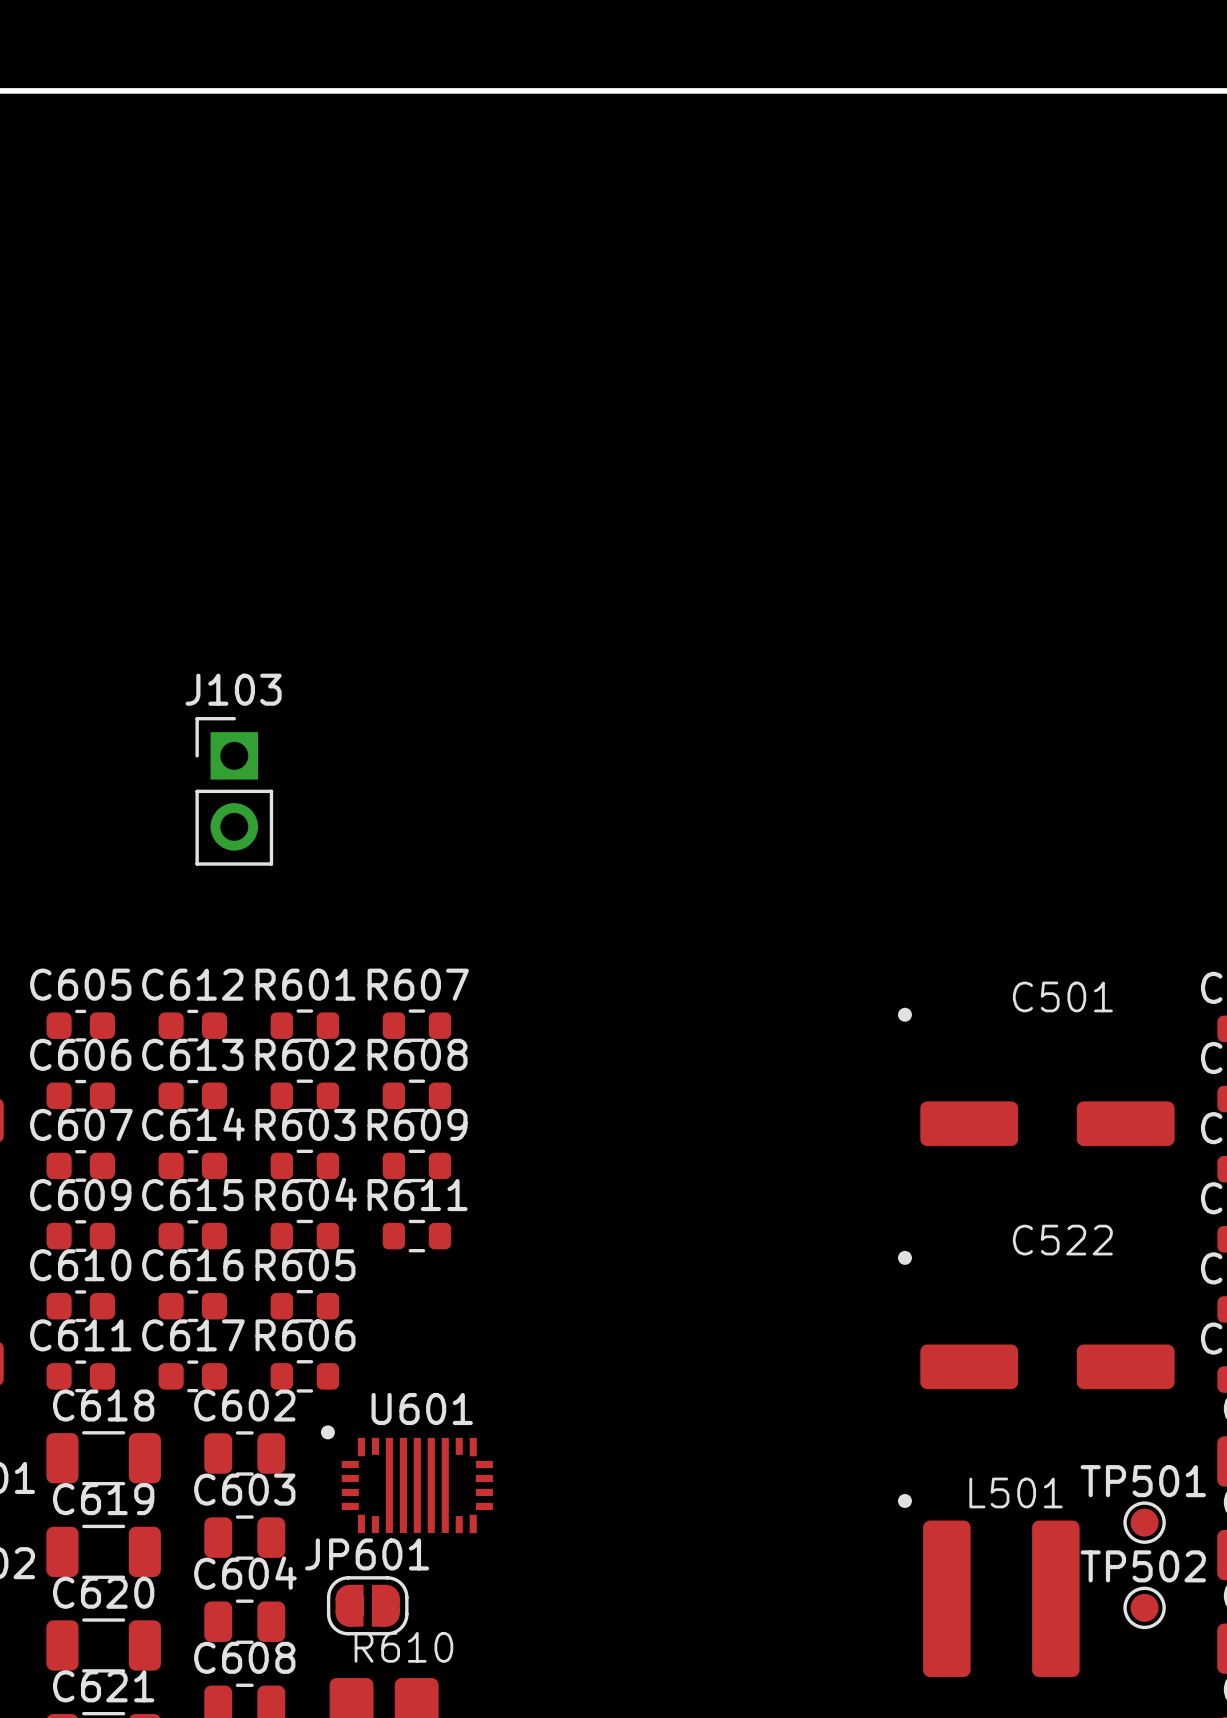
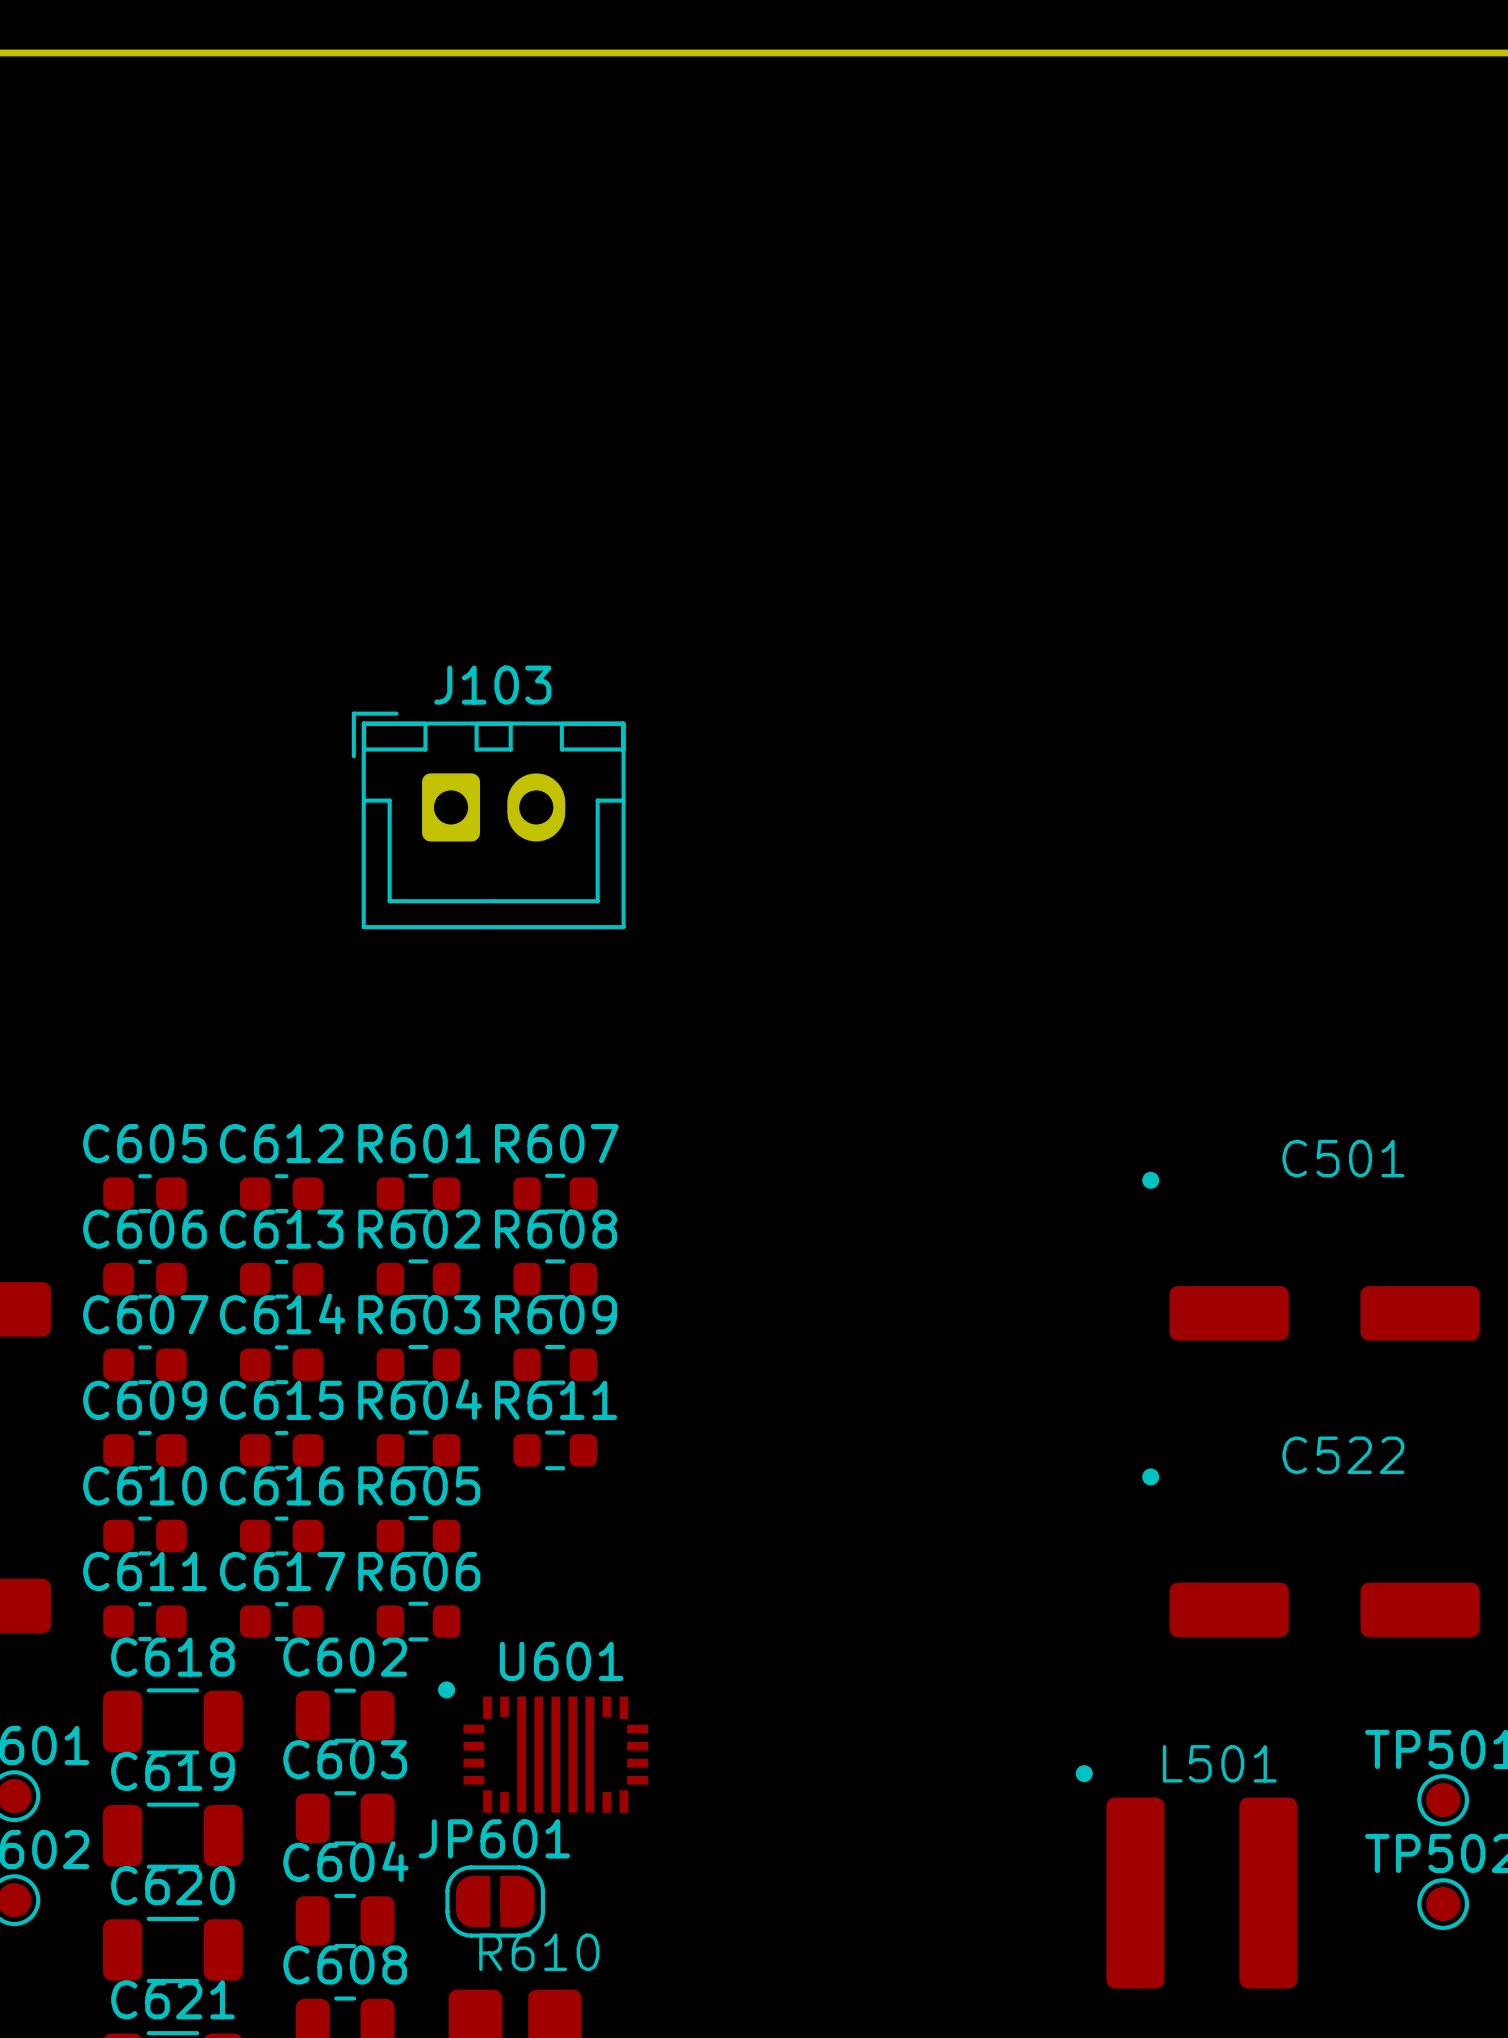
J103 footprint: [195, 717, 274, 866] -> [351, 711, 626, 930]
L501 position: (988, 1585) -> (1186, 1876)

